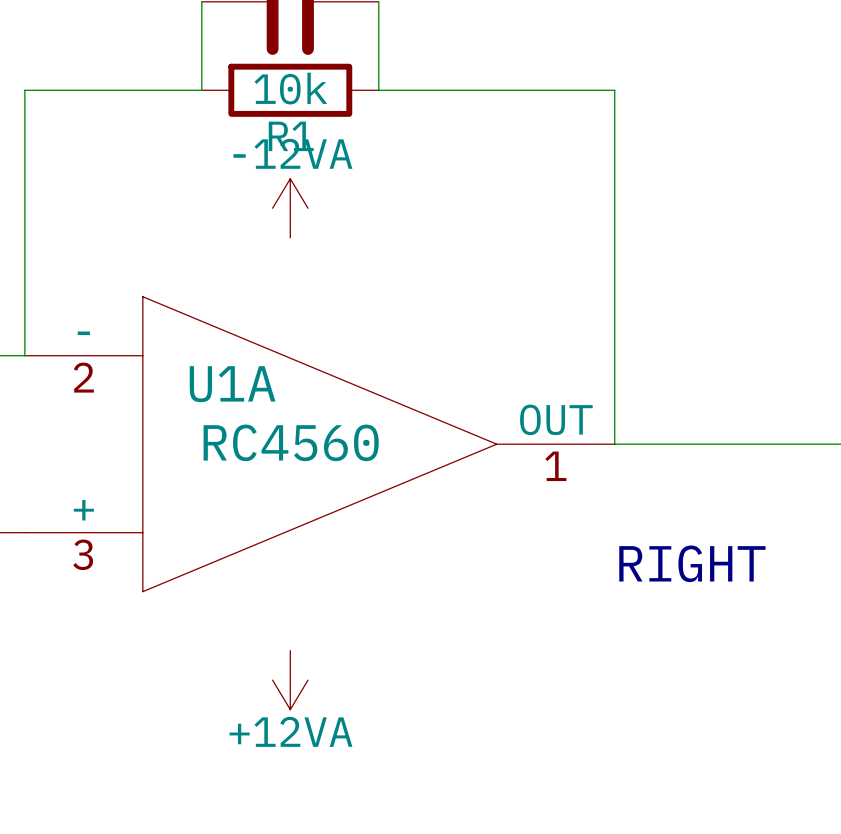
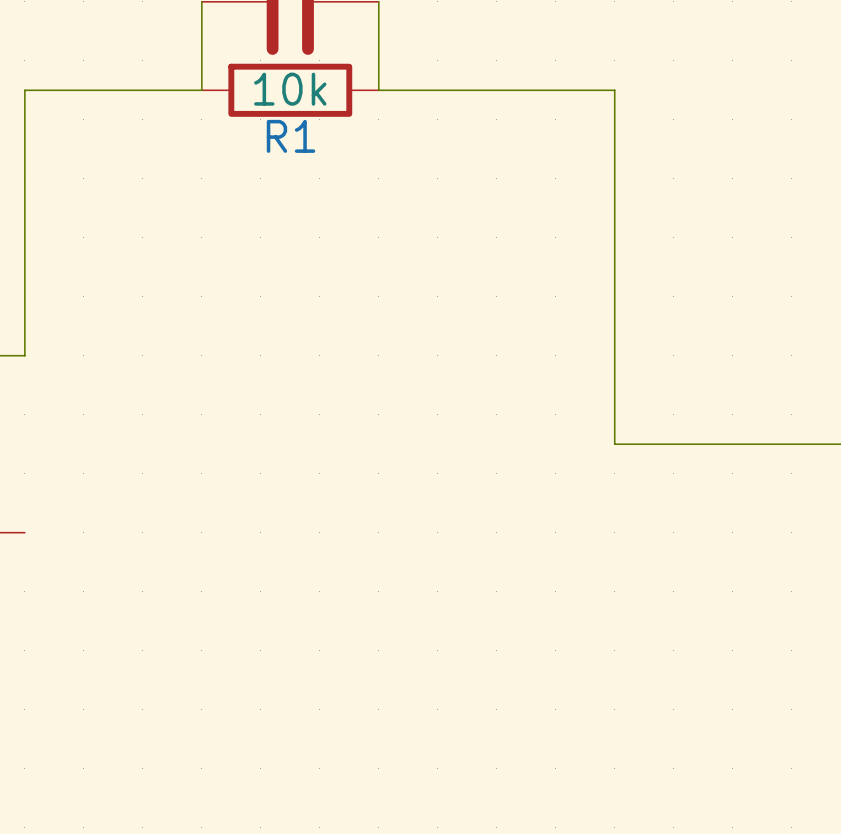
power symbol: -12VA (290, 208) -> none
U1A: RC4560 (319, 444) -> none
text: RIGHT (692, 563) -> none
power symbol: +12VA (290, 680) -> none

